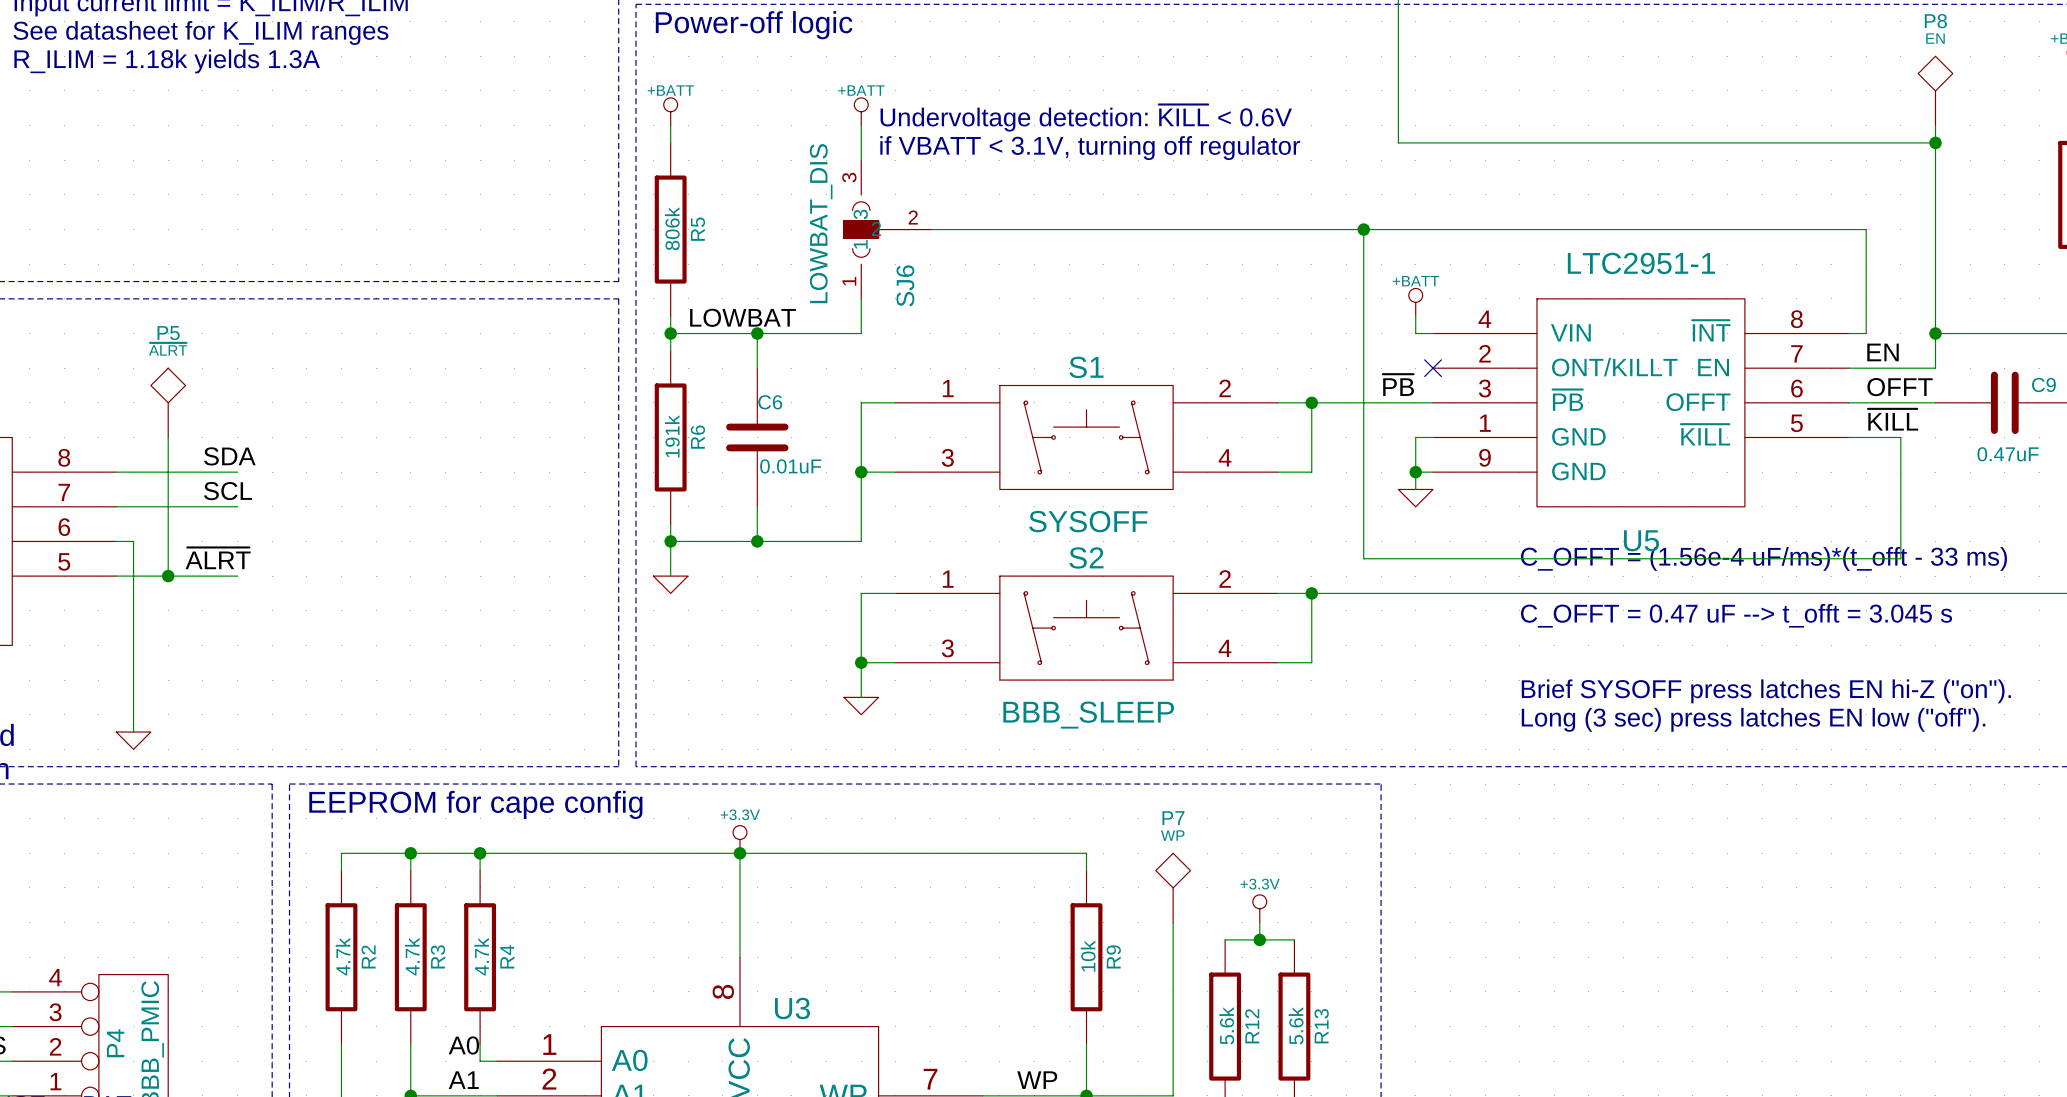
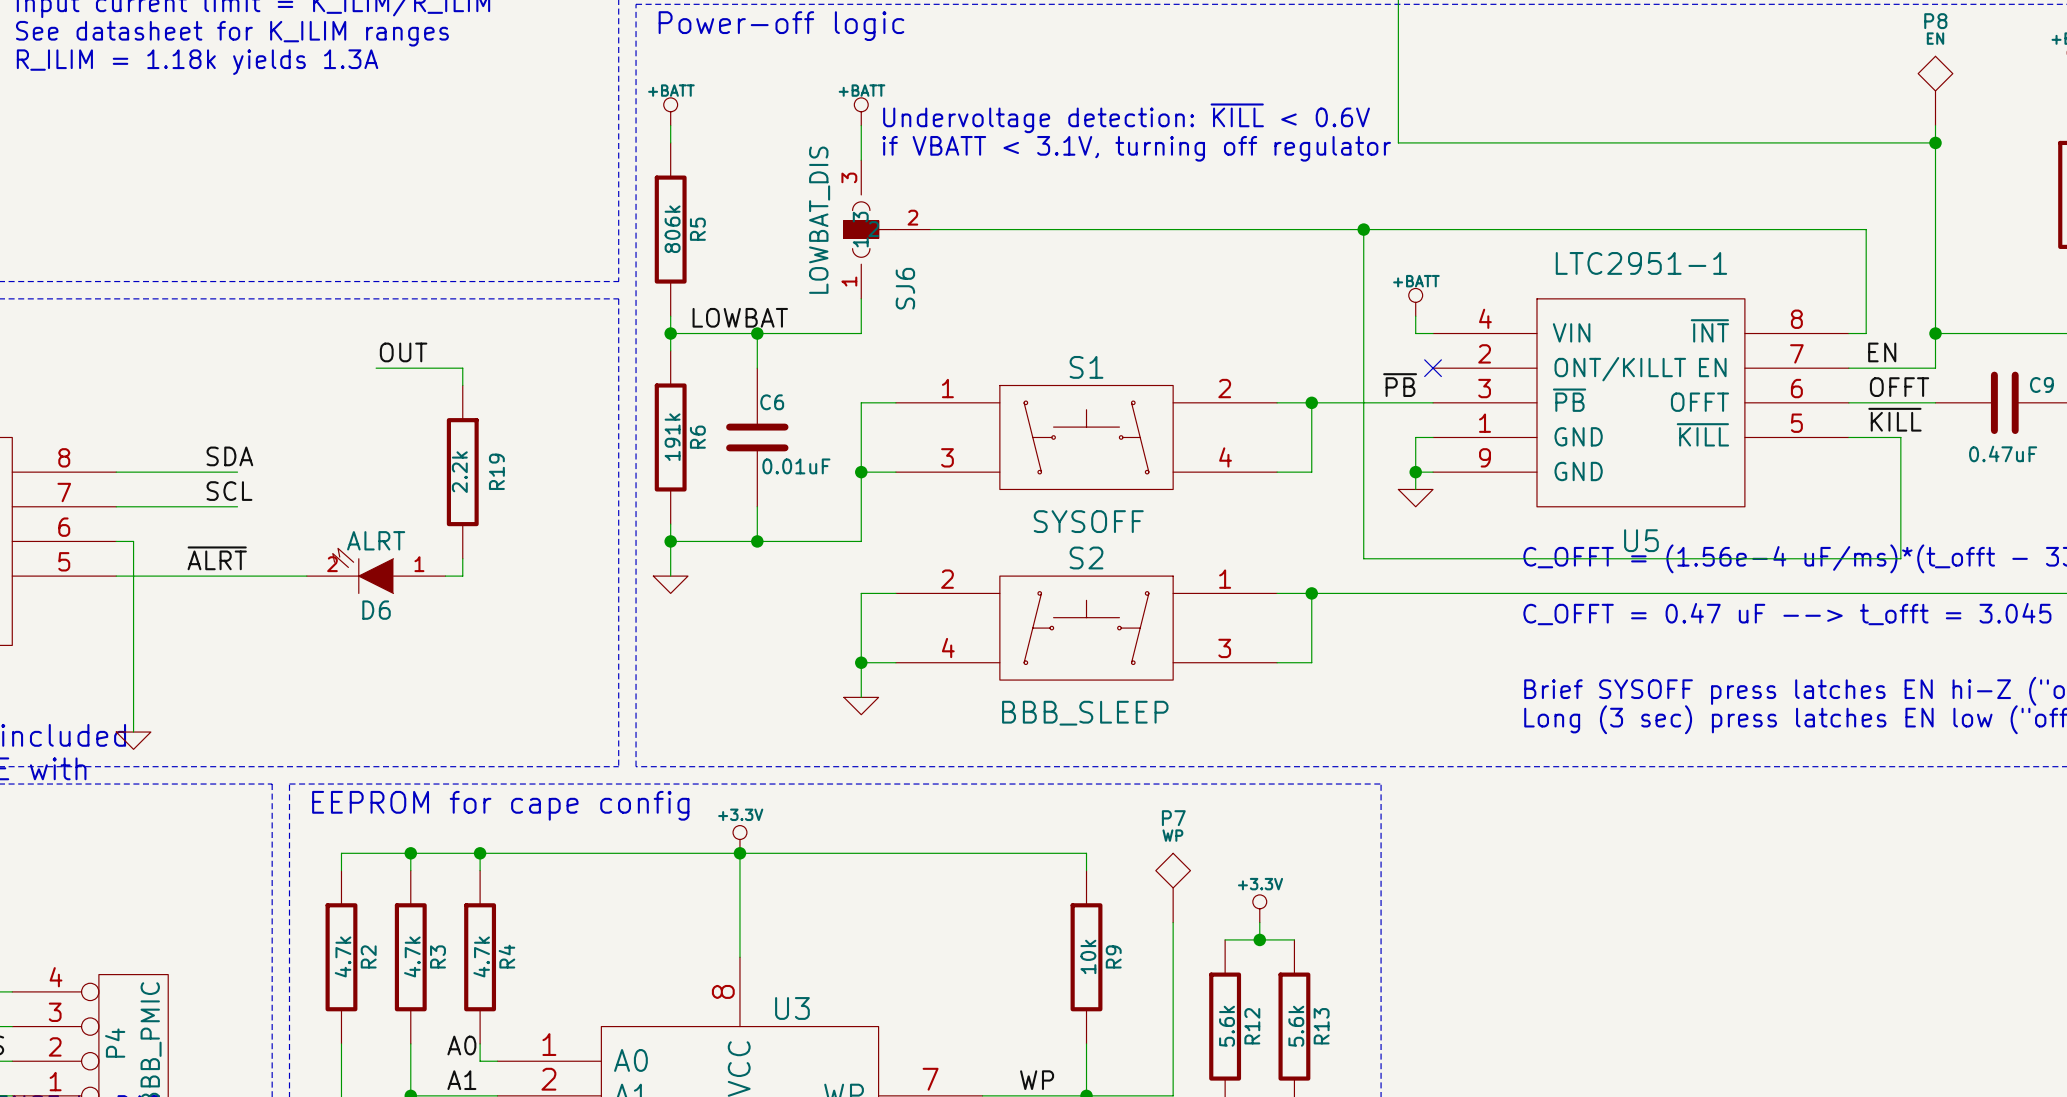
label: none -> OUT (403, 352)
wire: none -> (376, 368) (462, 368) (462, 385)
P5: ~{ALRT} (168, 402) -> none
wire: (168, 437) (168, 576) -> none
R19: none -> 2.2k (462, 472)
wire: none -> (462, 558) (462, 576) (445, 576)
D6: none -> ALRT (376, 570)
junction: (168, 576) -> none
wire: none -> (237, 576) (306, 576)
S2 flip: as is (1086, 628) -> left-right (1086, 628)

